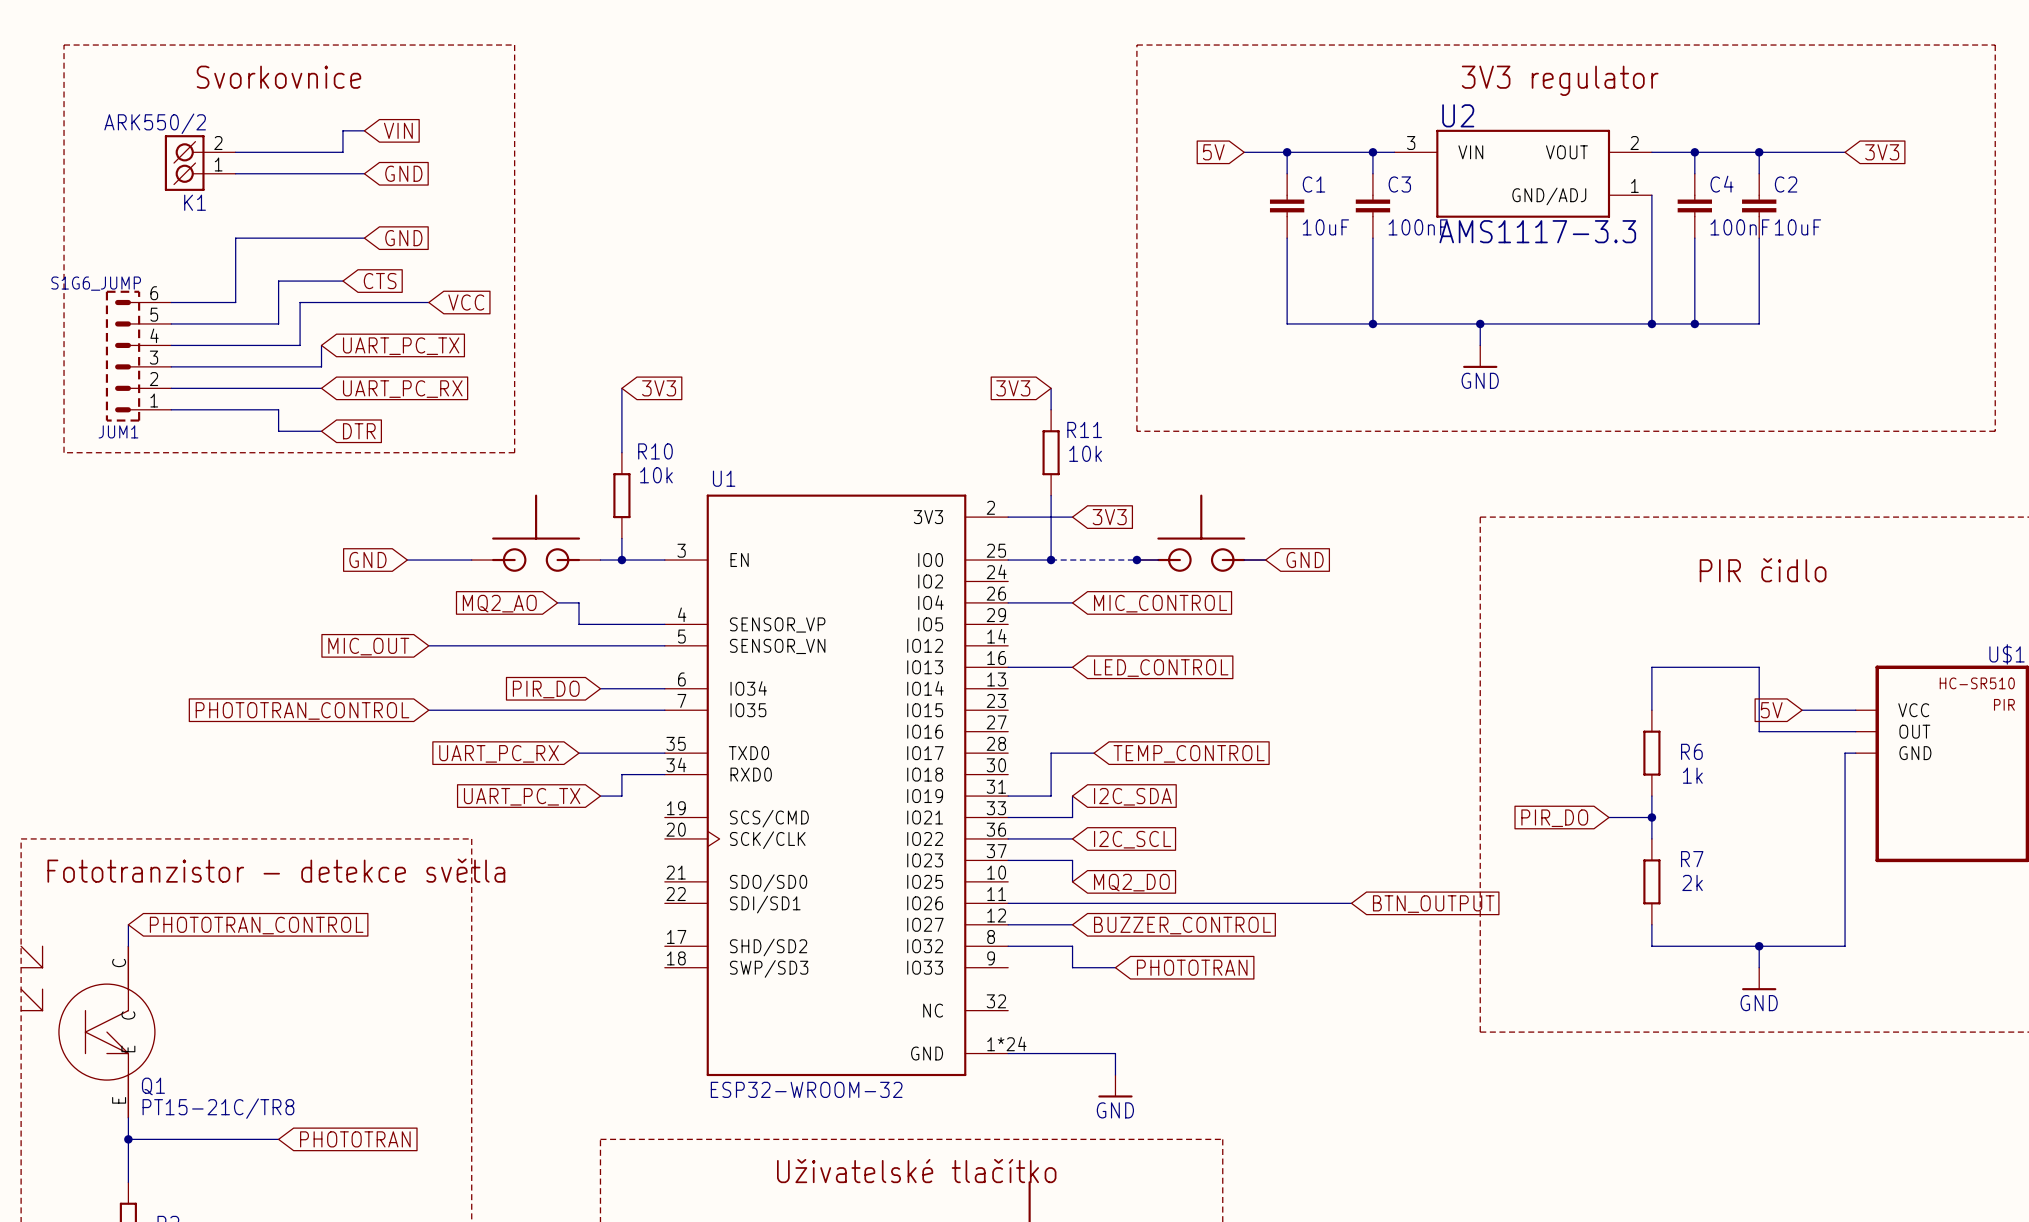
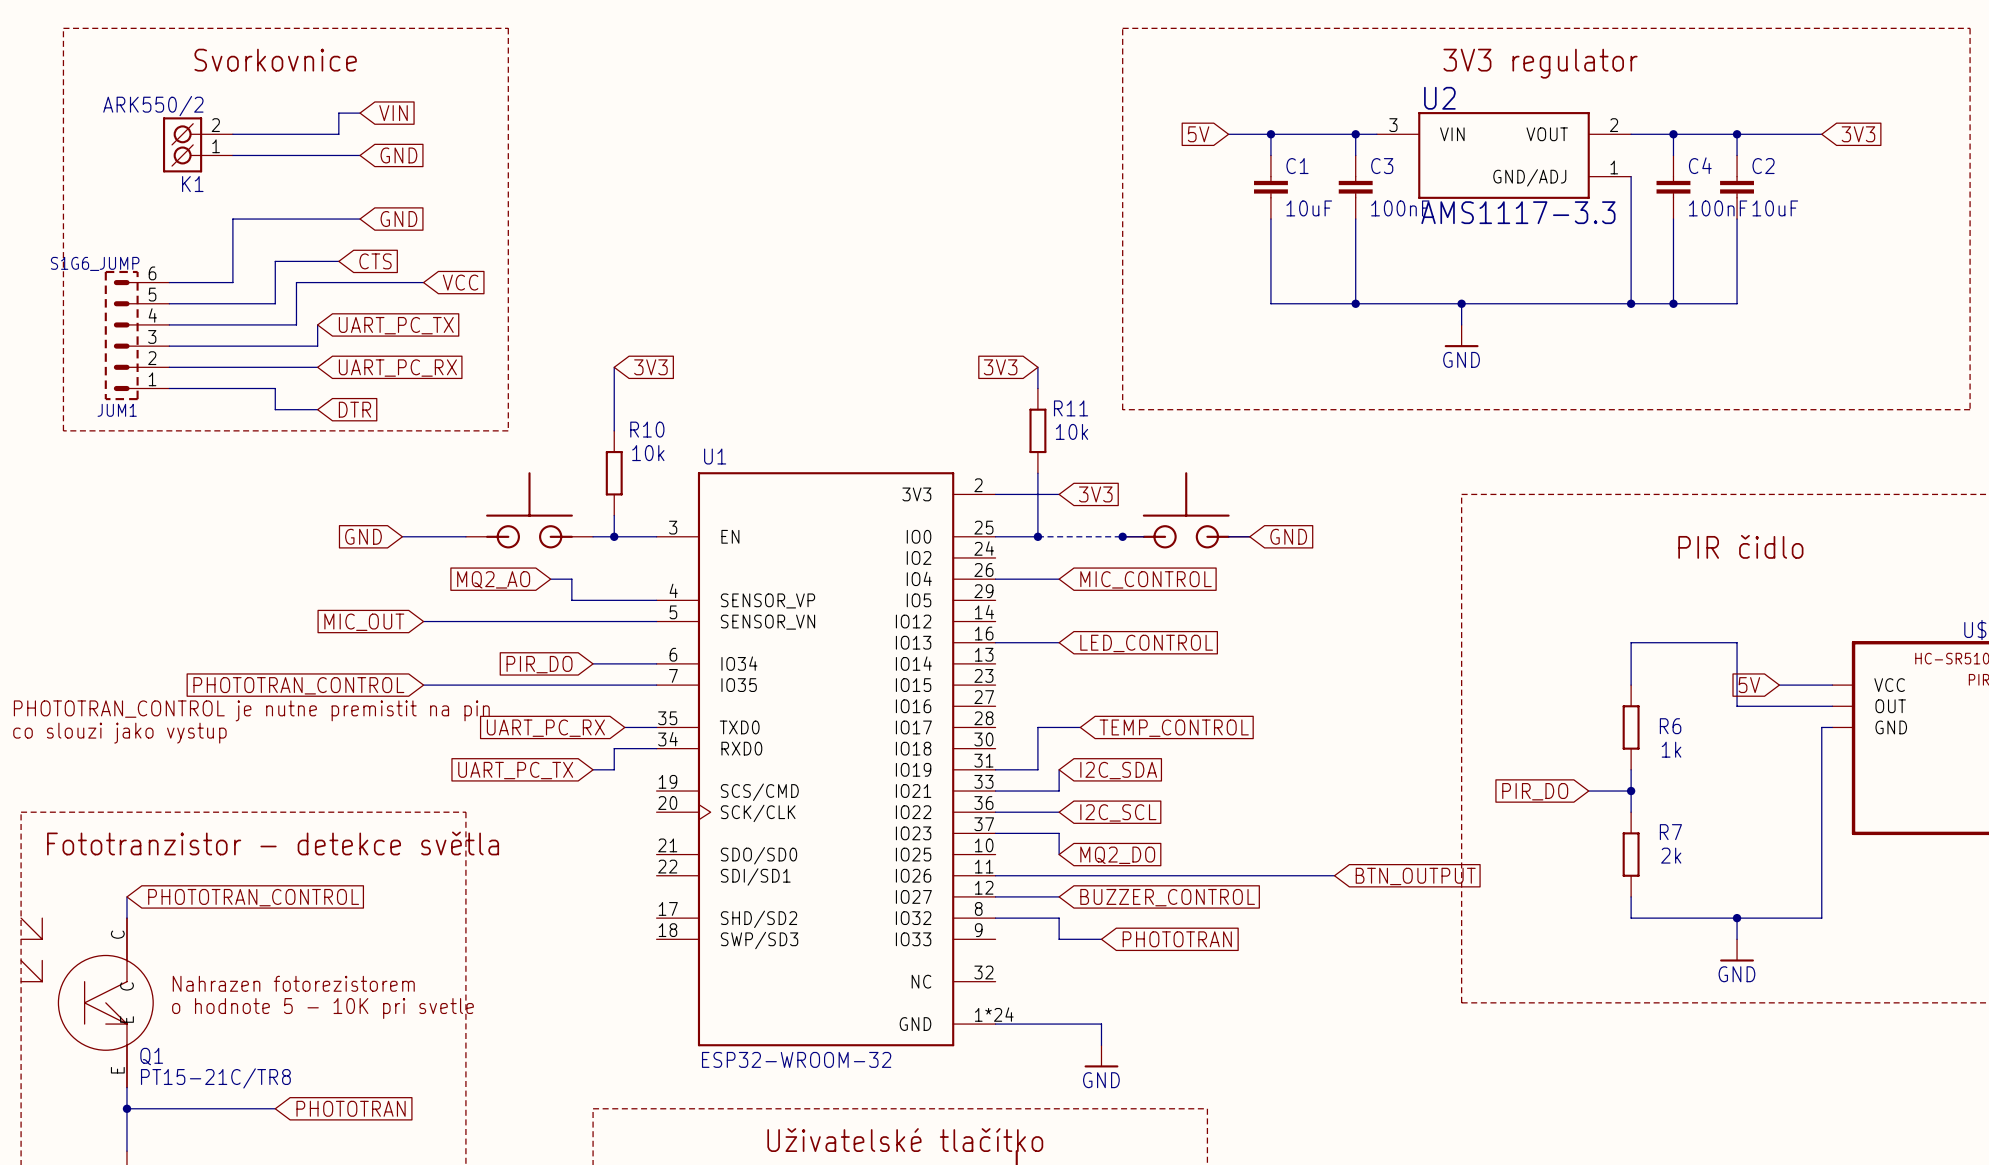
text: none -> PHOTOTRAN_CONTROL je nutne premistit na pin (251, 710)
global label position: UART_PC_RX (499, 753) -> UART_PC_RX (545, 728)
wire: (579, 753) (632, 753) -> none
text: none -> co slouzi jako vystup (119, 733)
text: none -> Nahrazen fotorezistorem (293, 983)
text: none -> o hodnote 5 - 10K pri svetle (322, 1008)

